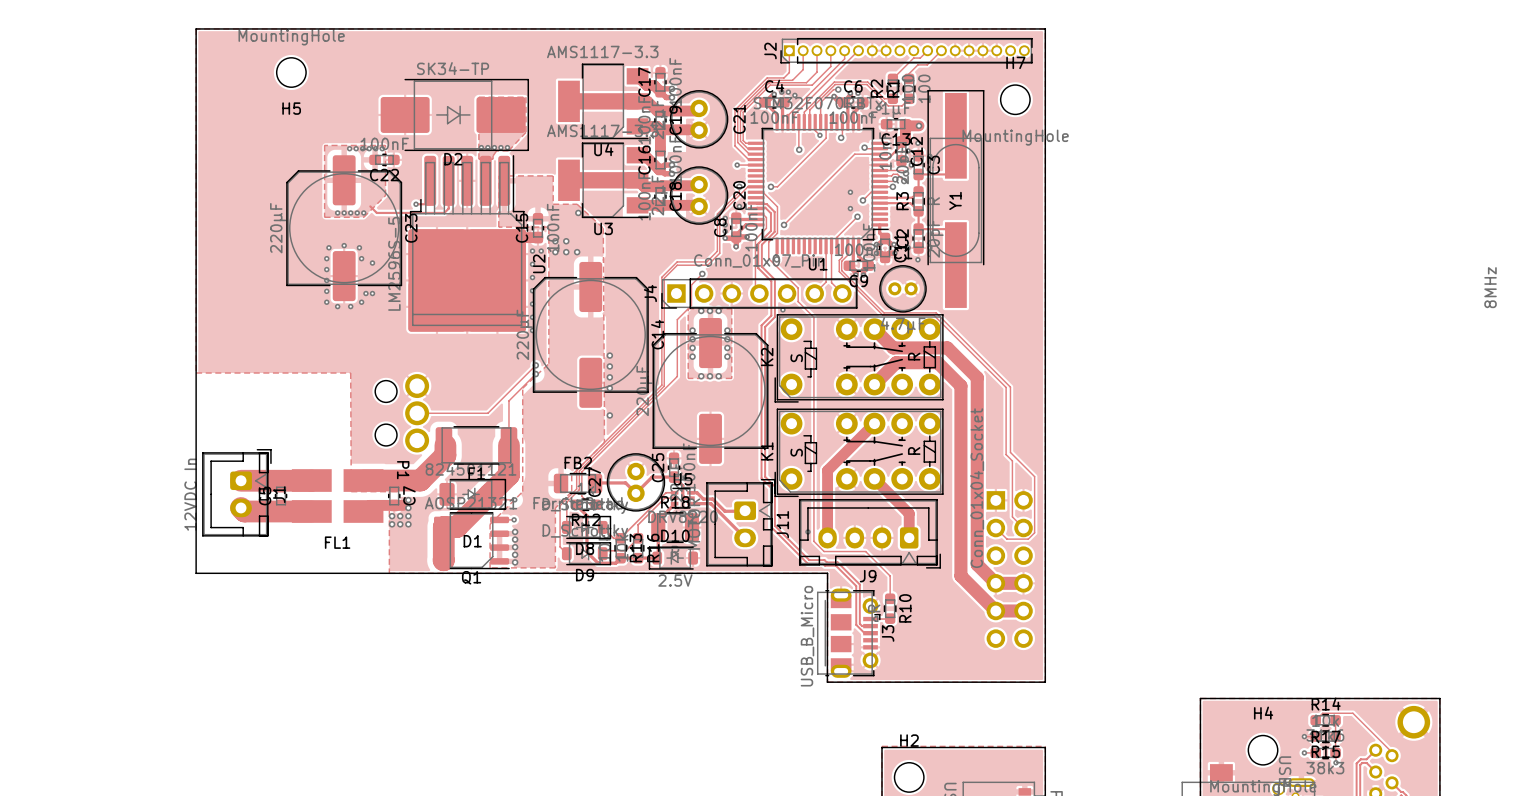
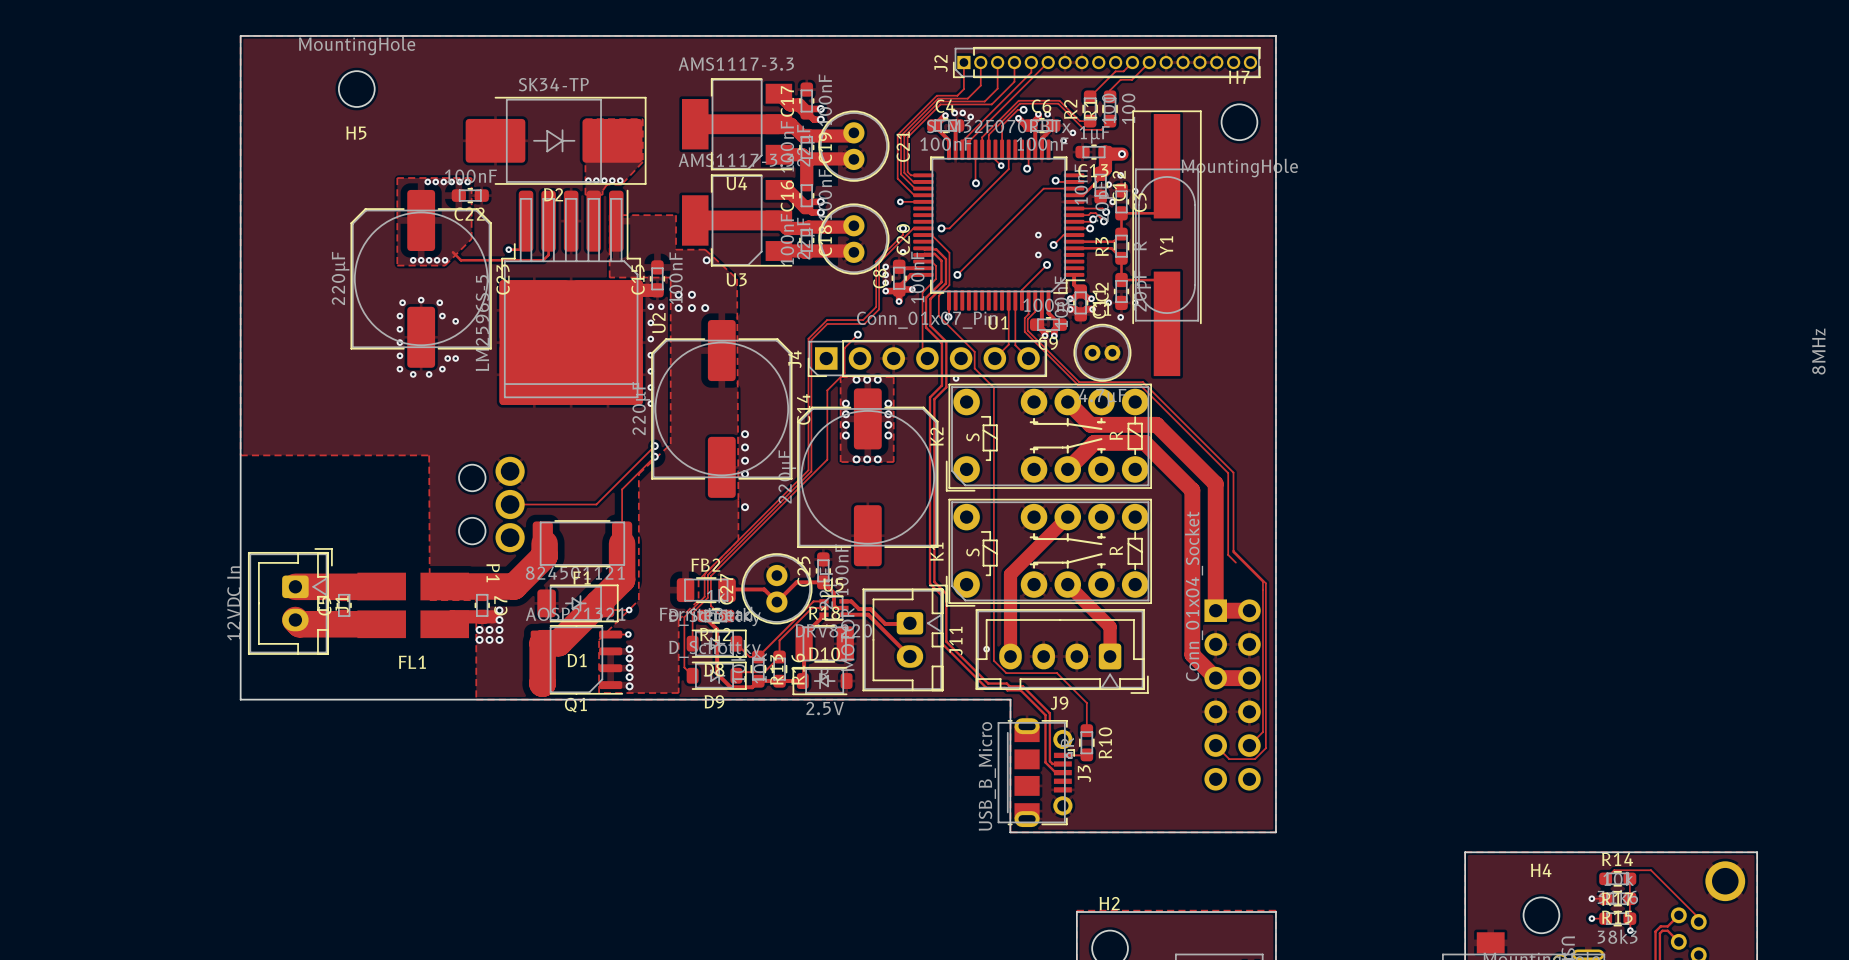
track: (977, 377) (977, 564) (995, 583) (1023, 583) -> (1193, 461) (1215, 483) (1215, 610) (1249, 610)
track: (960, 385) (960, 576) (995, 610) (1023, 610) -> (1173, 471) (1192, 490) (1192, 654) (1215, 678) (1249, 678)
track: none -> (1233, 550) (1265, 583) (1265, 748) (1255, 759) (1229, 759) (1215, 745)
track: (1012, 460) (1012, 516) (1023, 528) -> none
track: (995, 528) (1006, 539) (1028, 539) (1034, 532) -> (1249, 745) (1262, 732) (1262, 650)

